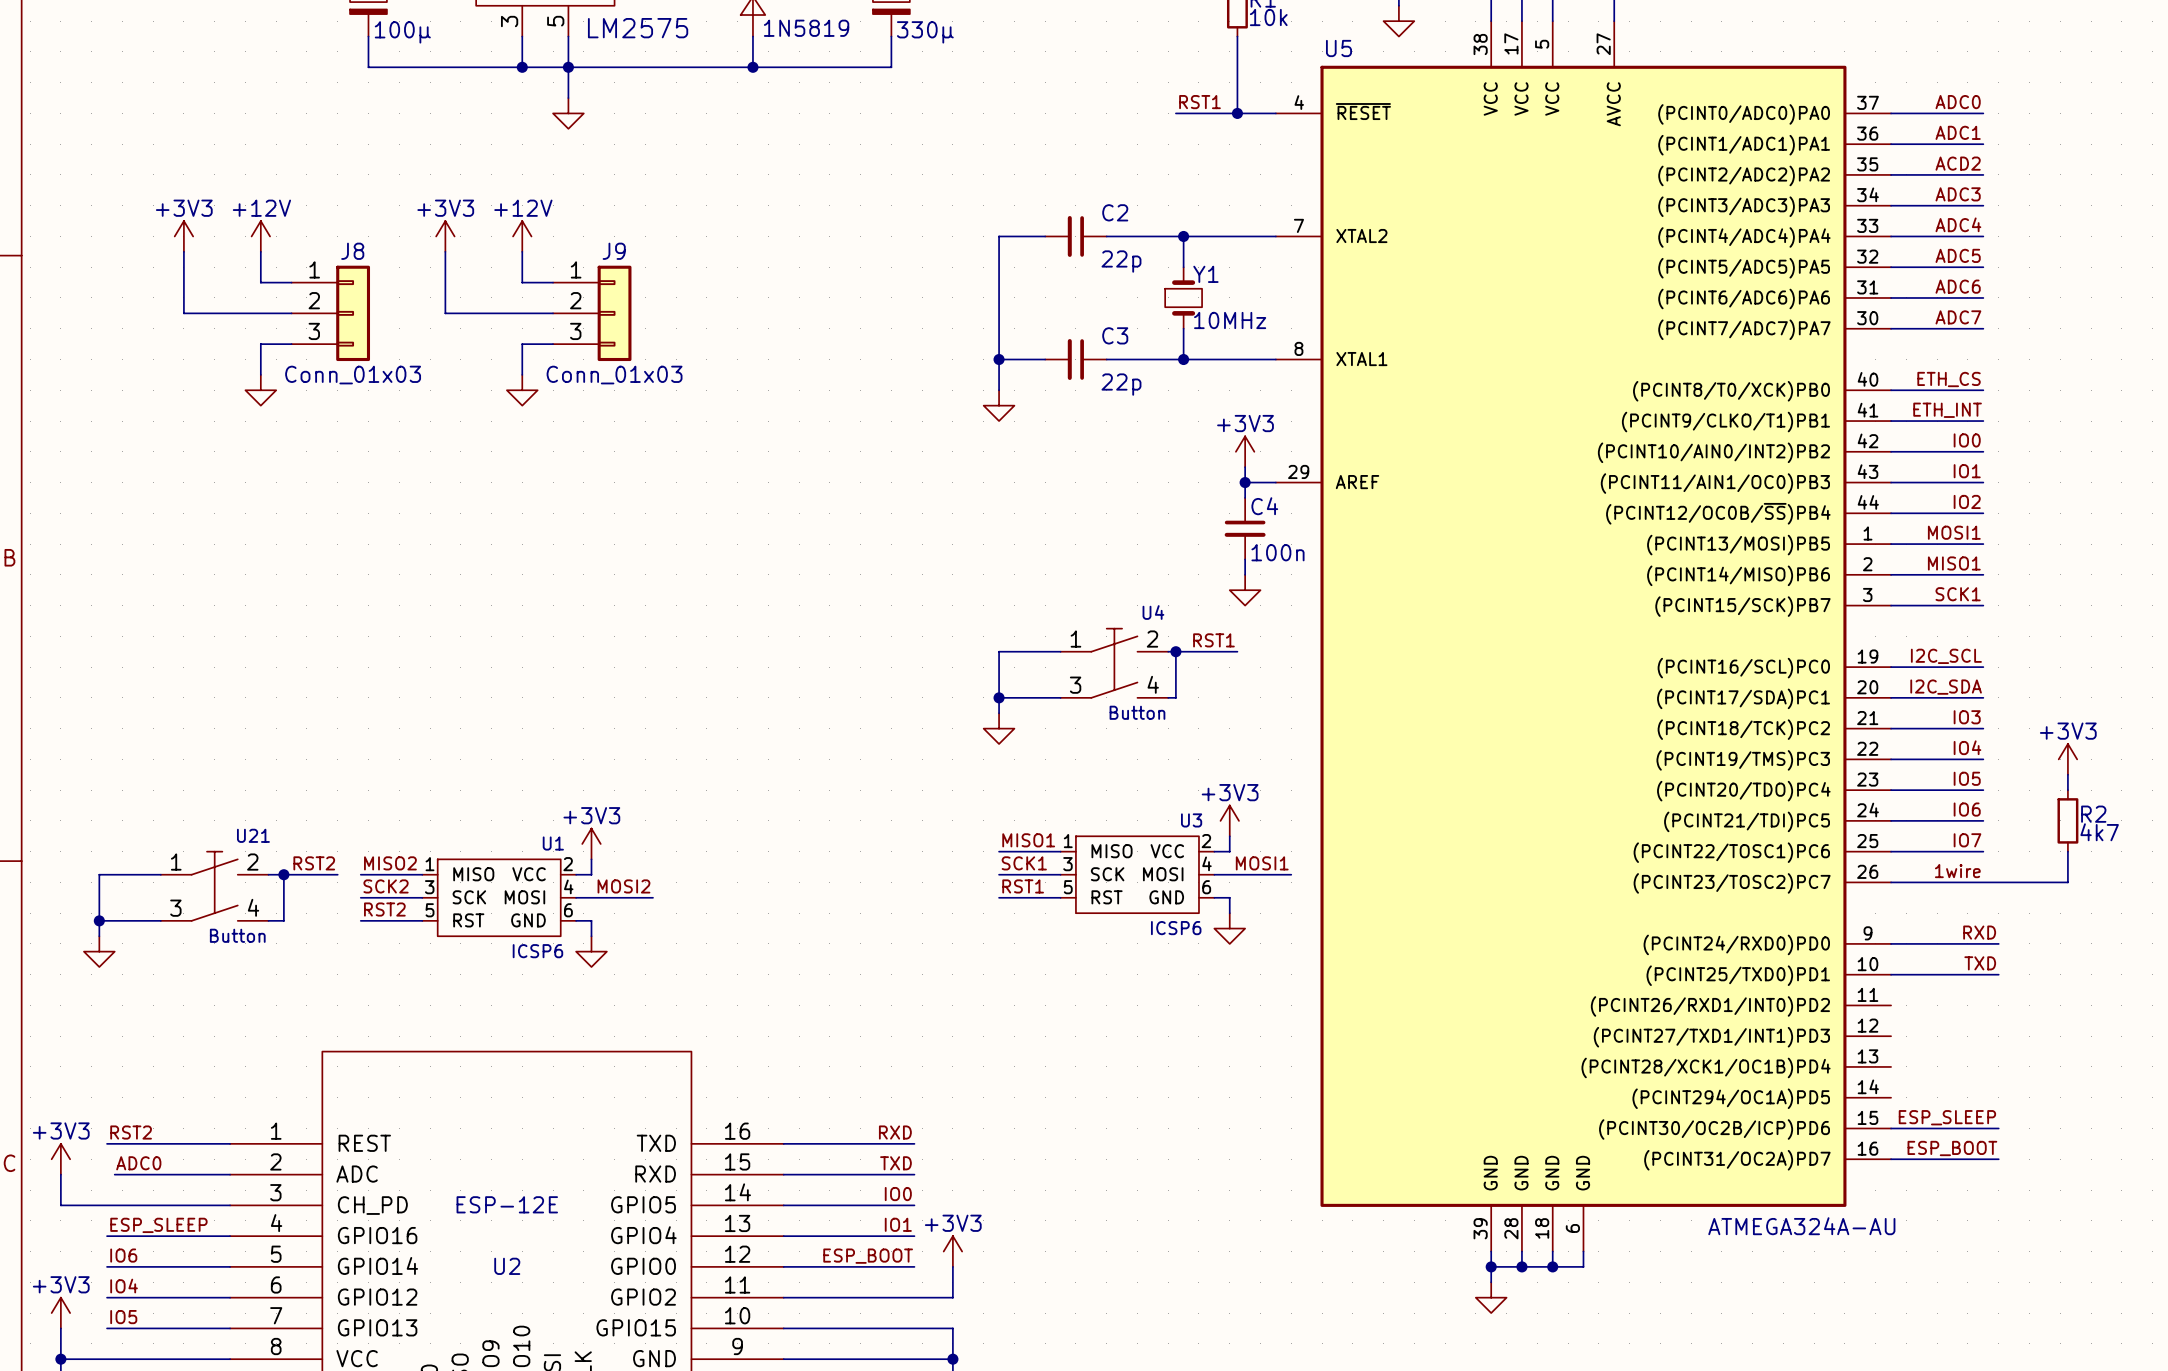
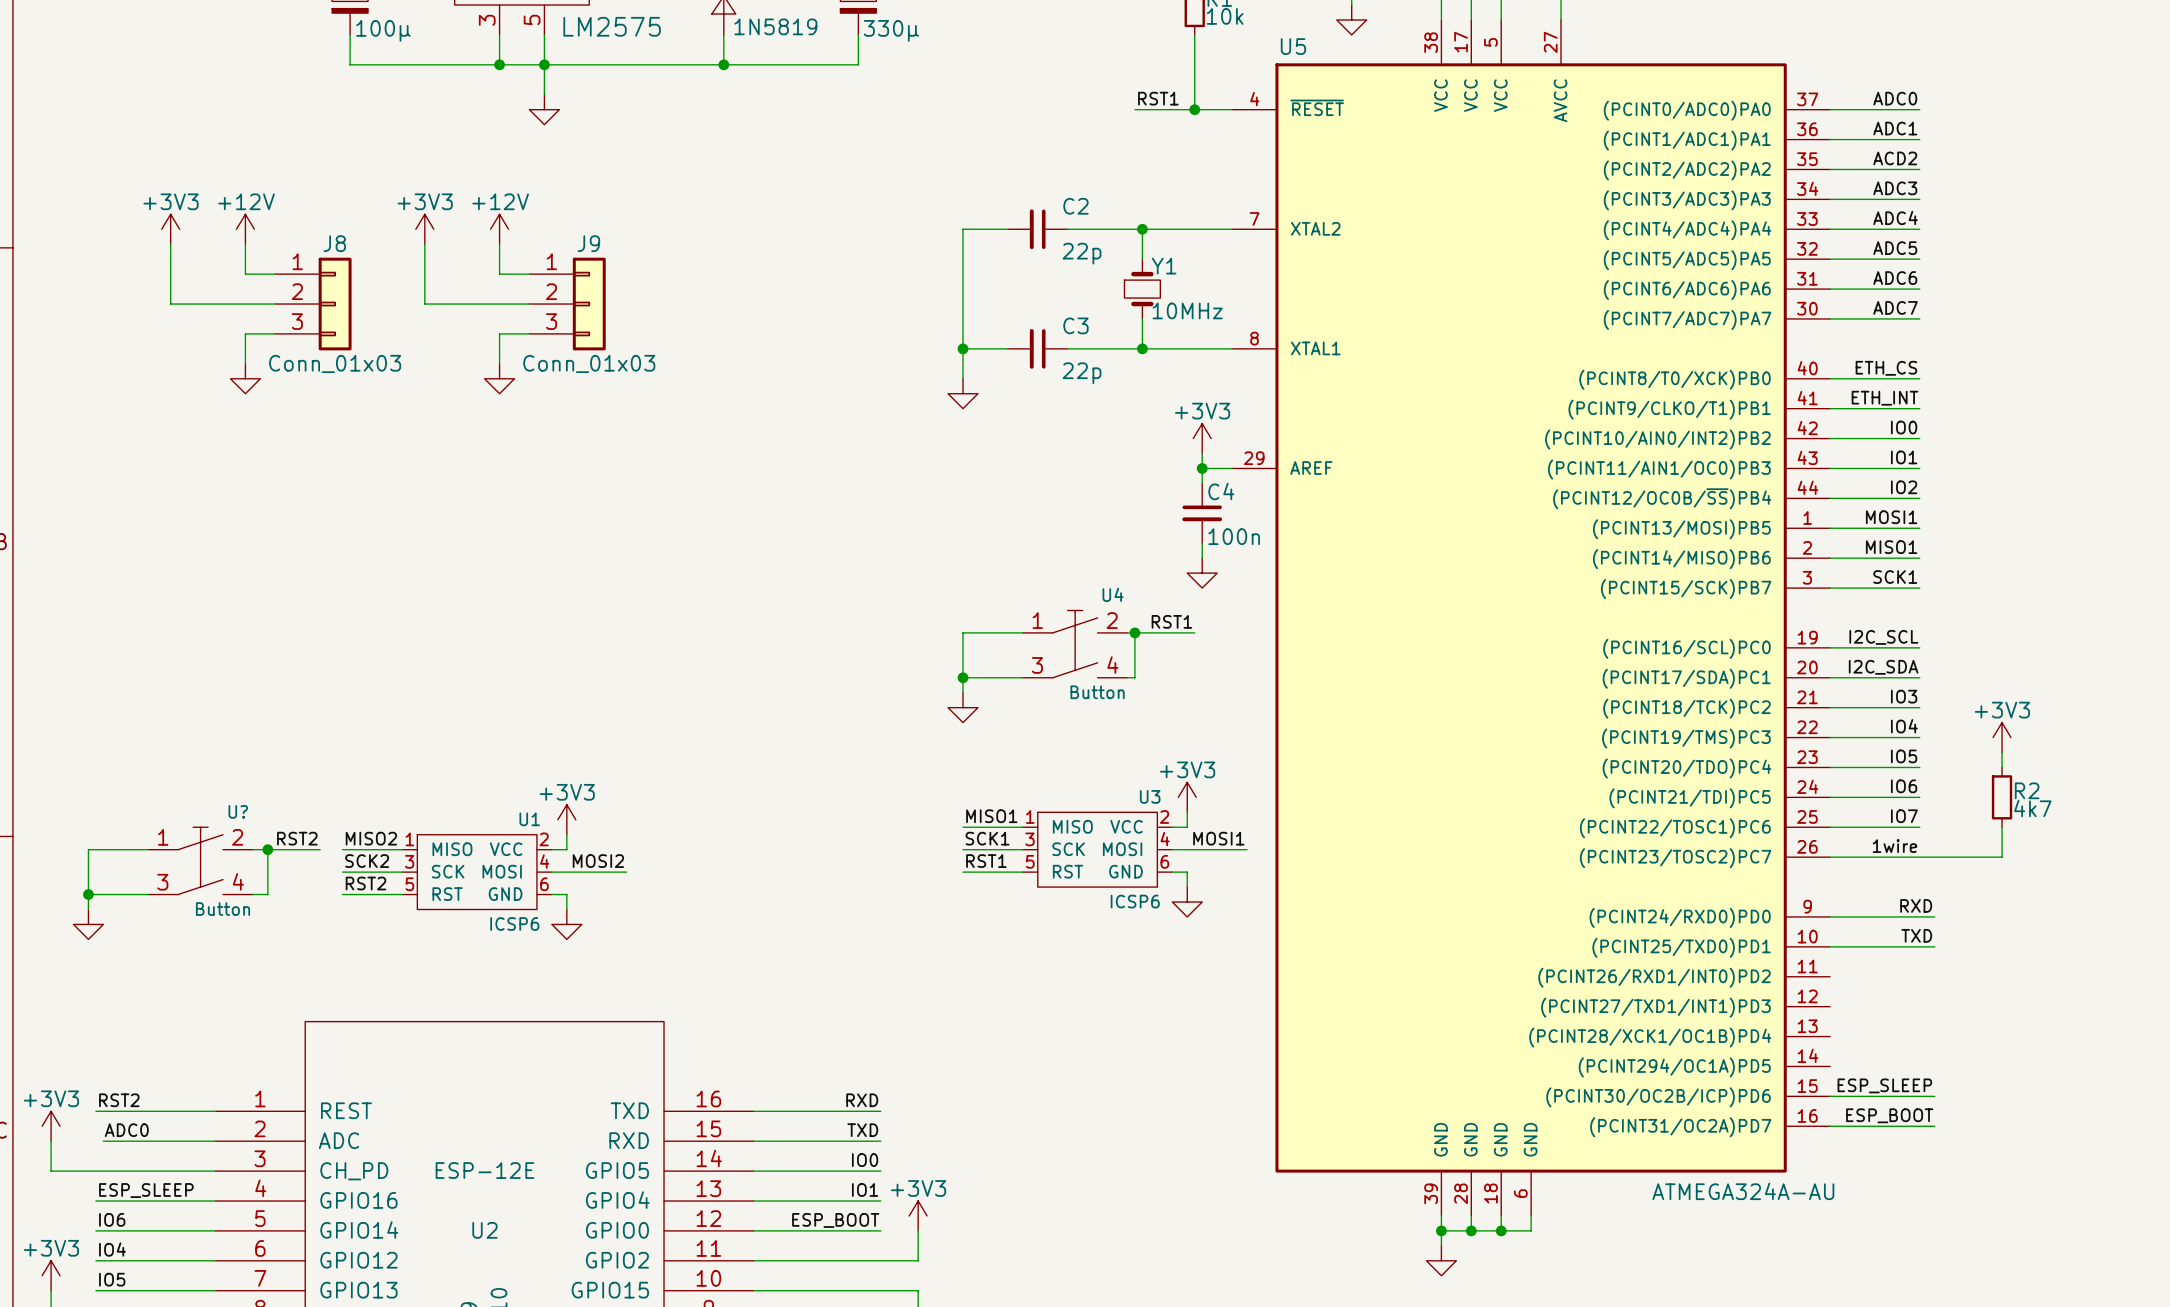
U21 name: U21 (253, 835) -> U? (238, 811)

